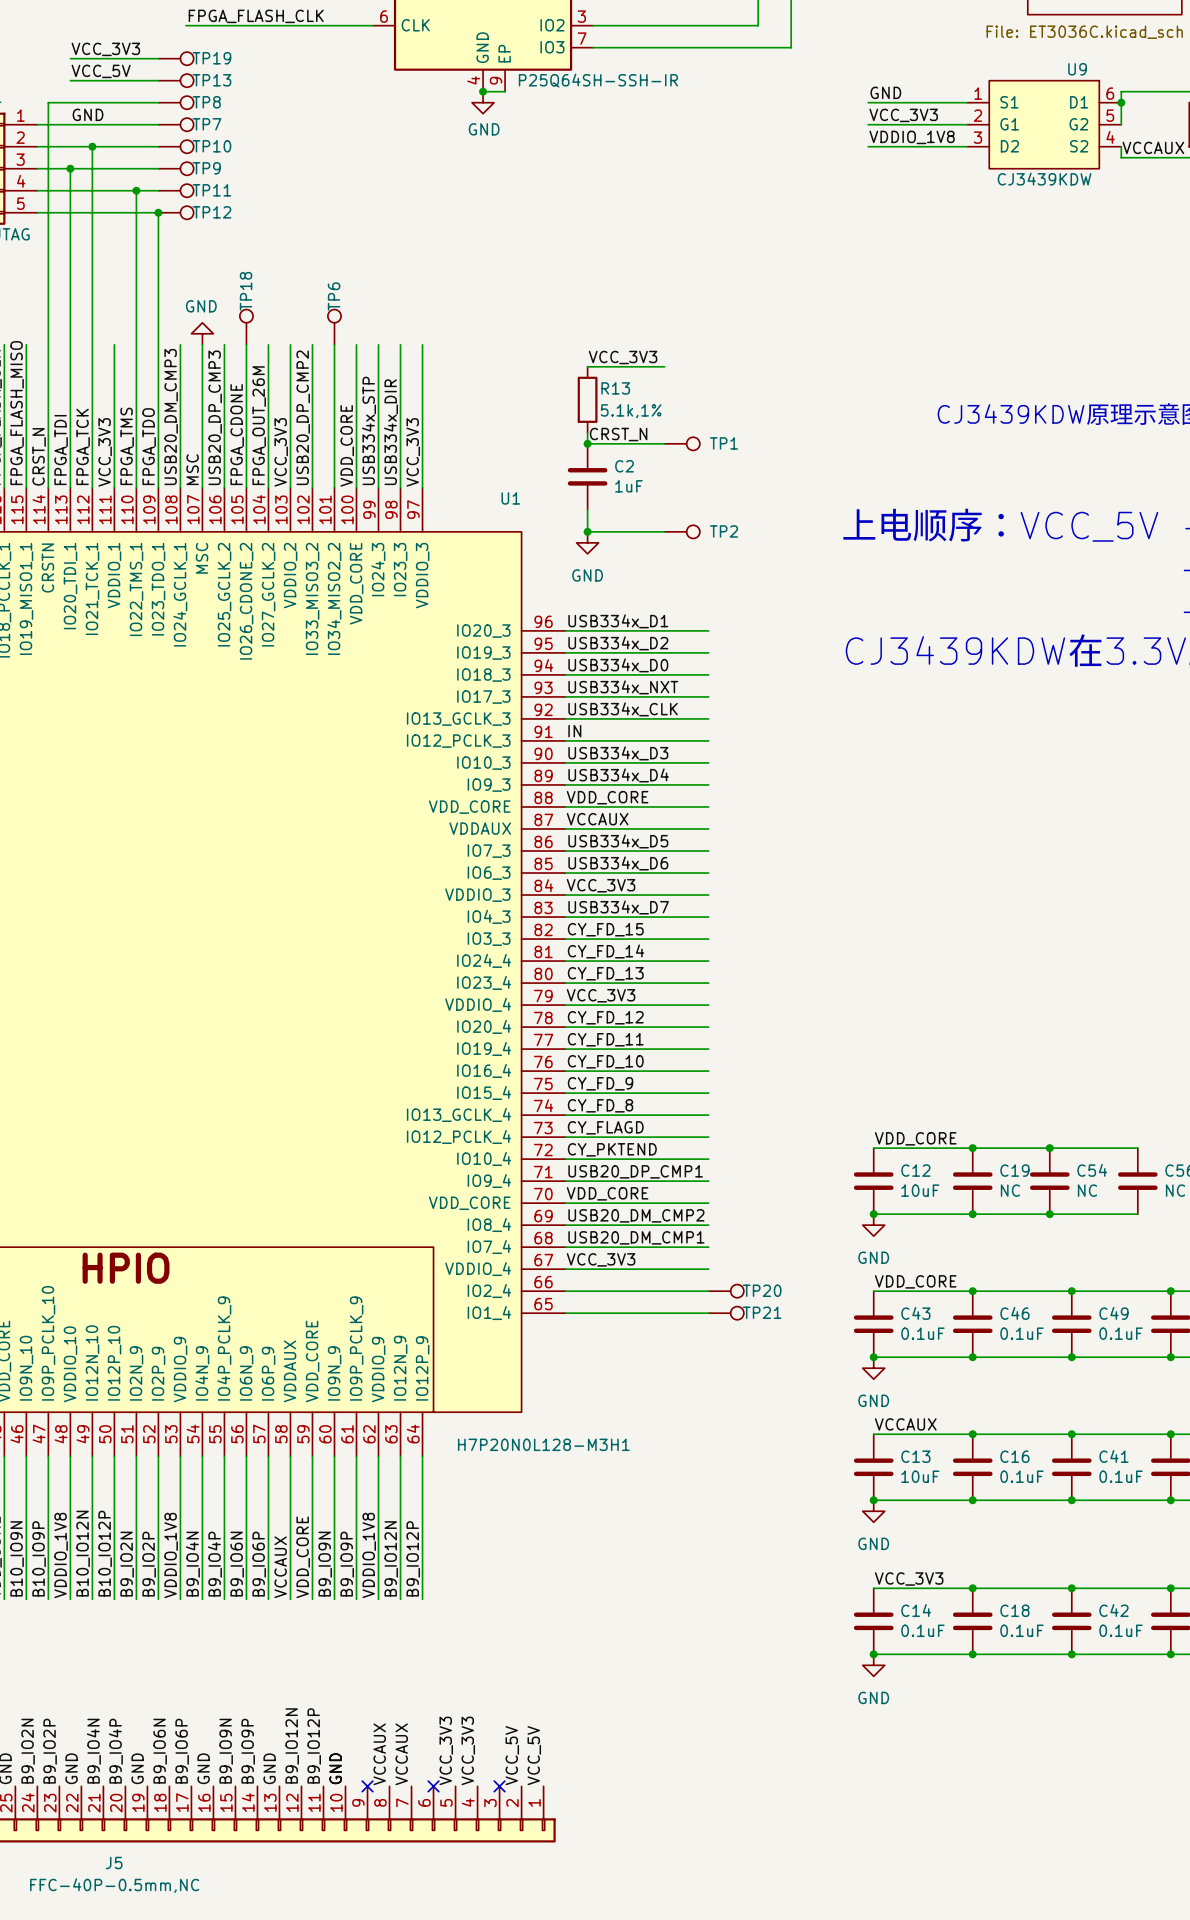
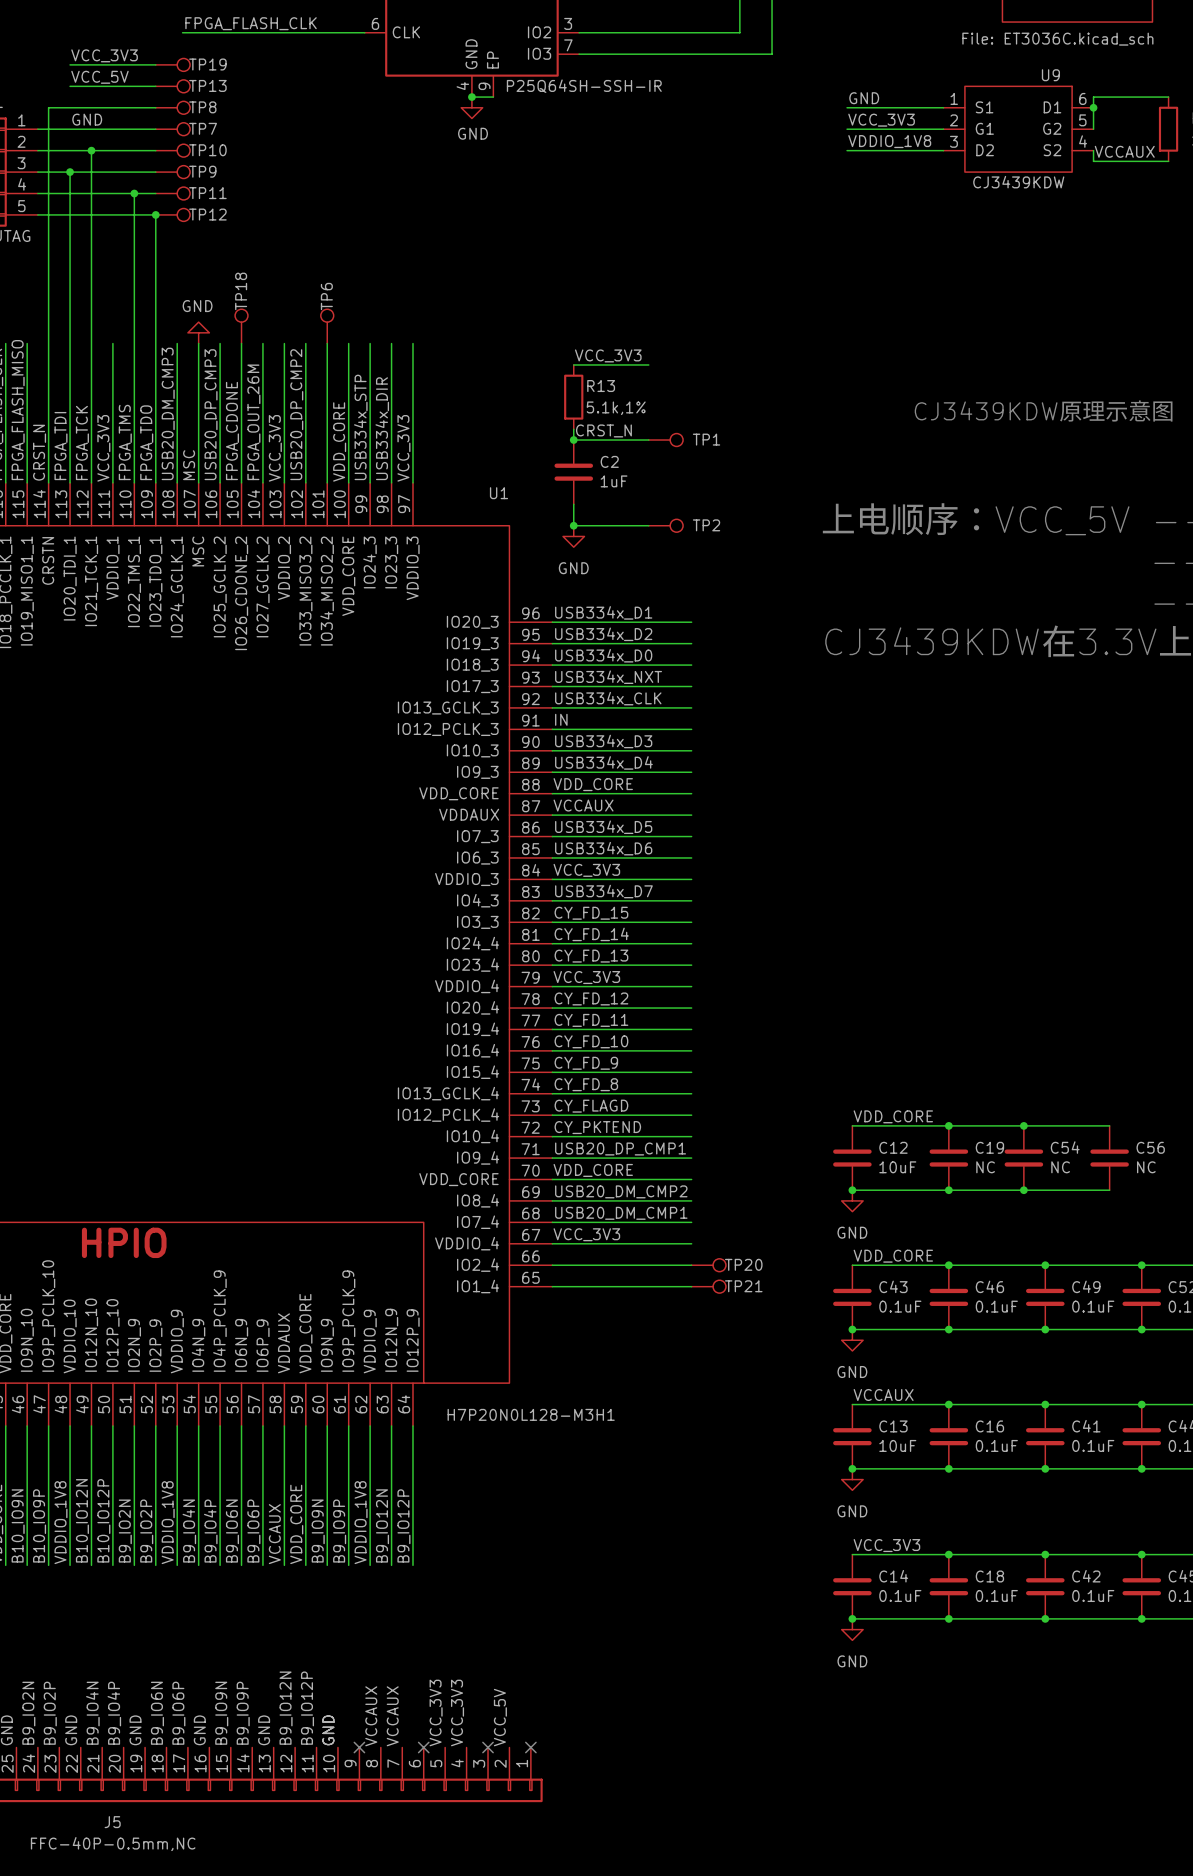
label: VCC_5V (534, 1755) -> none
no-connect mark: none -> (530, 1747)

